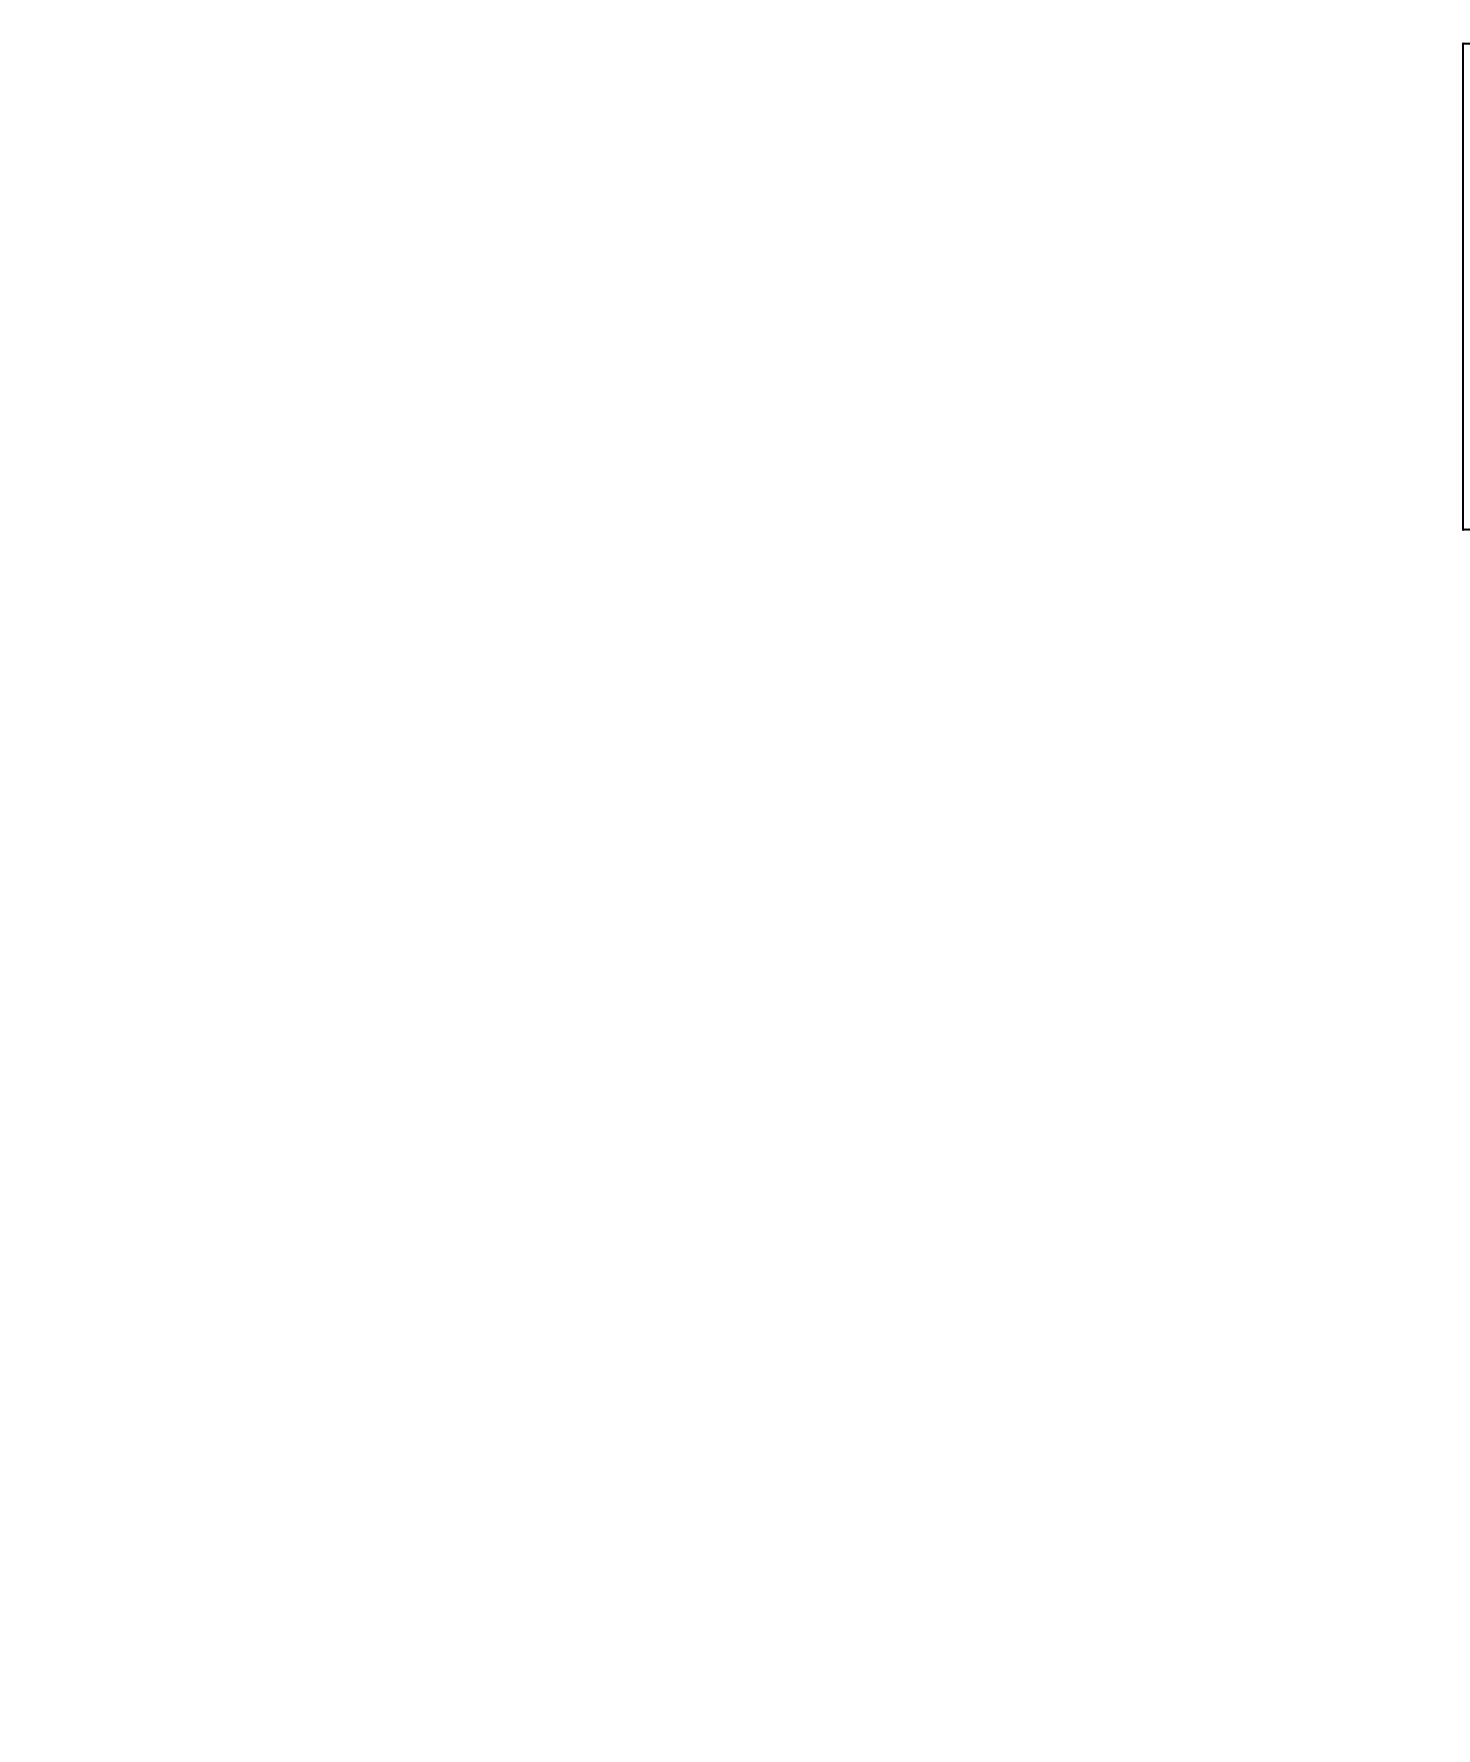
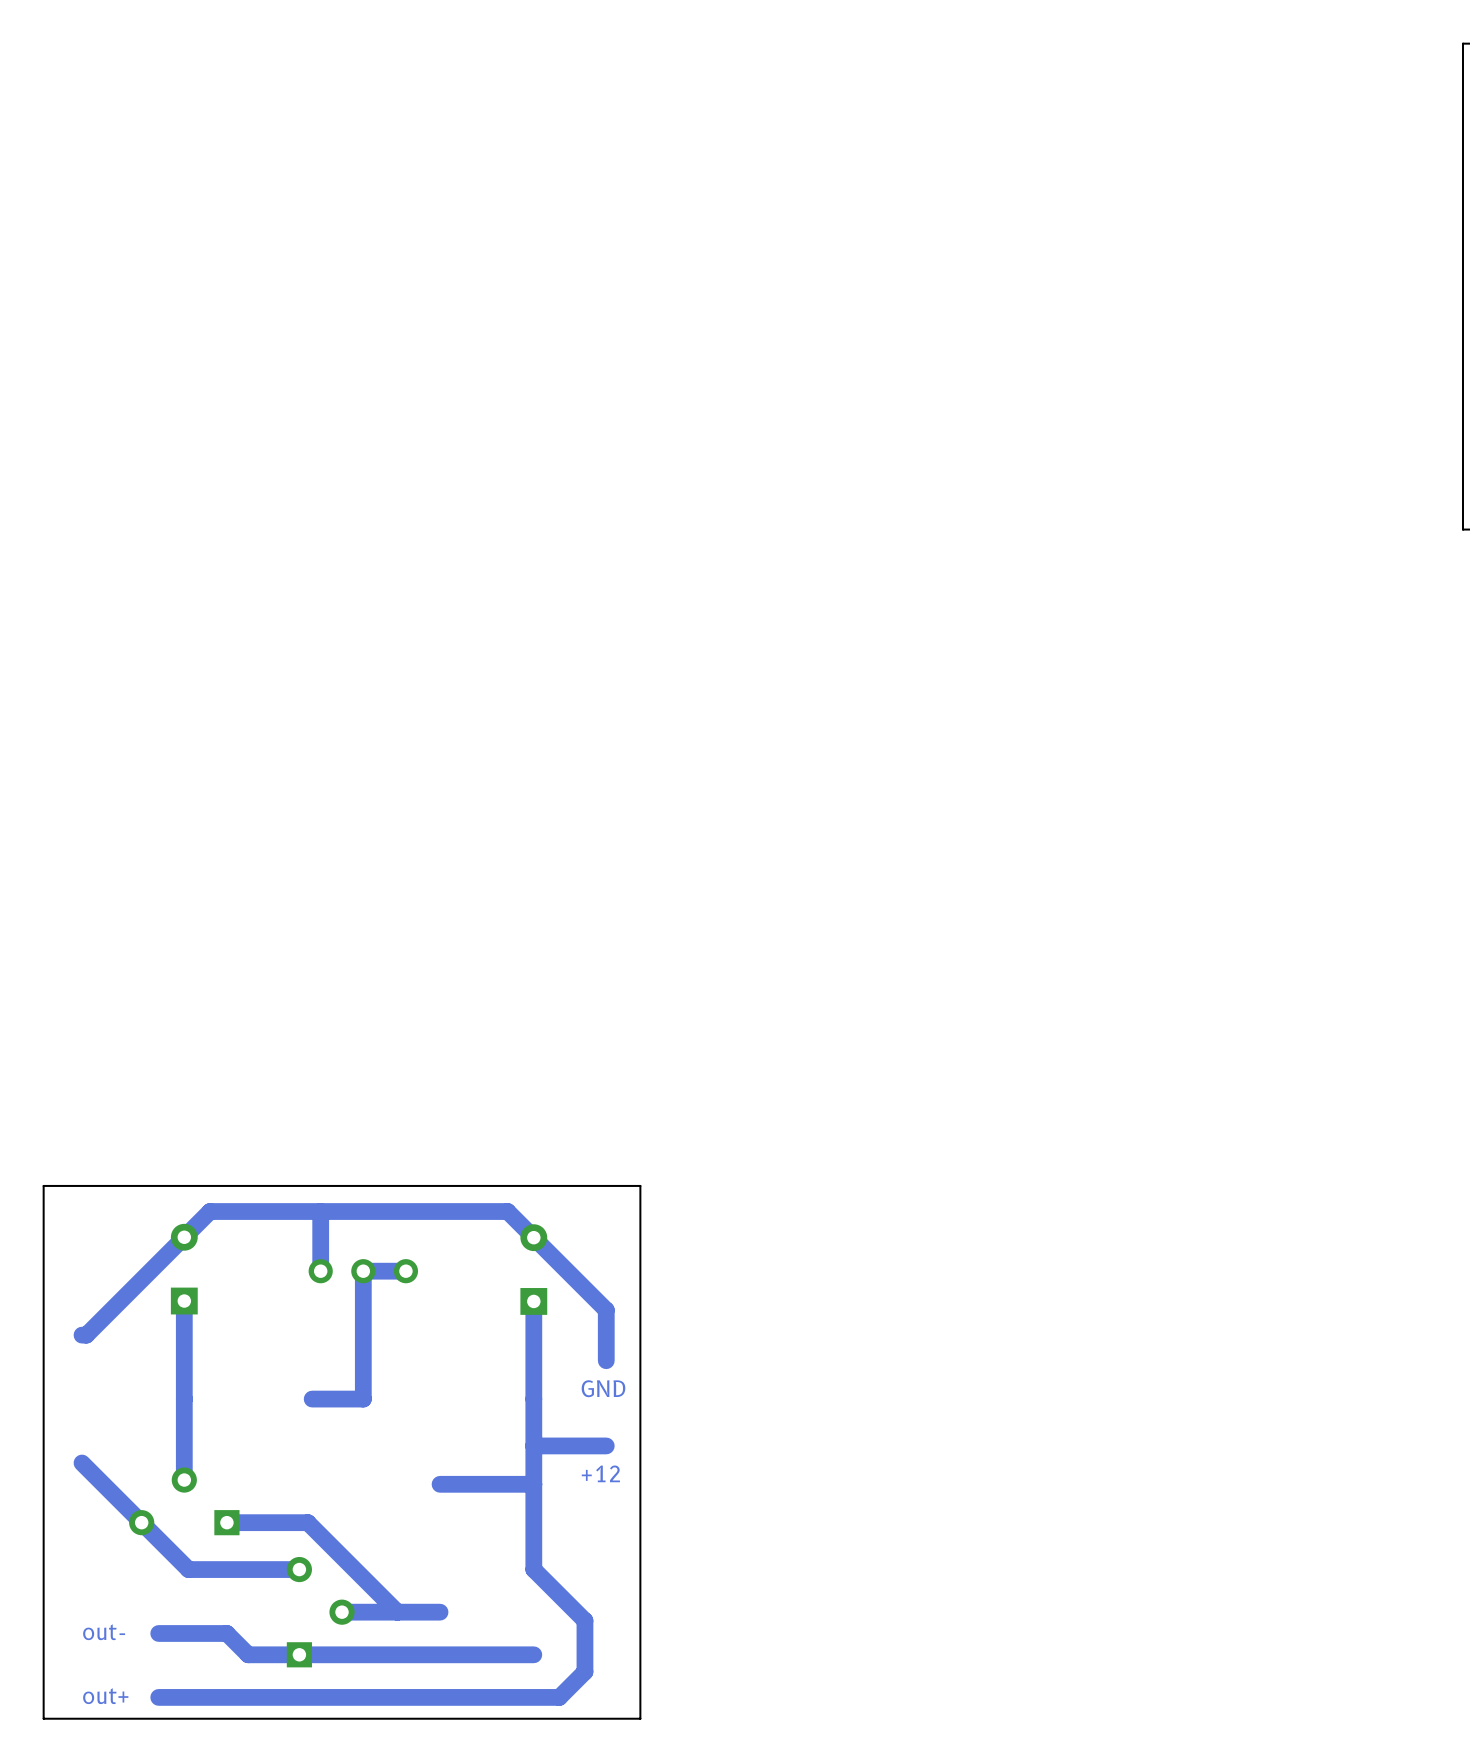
board edge: none -> (640, 1185) (43, 1185) (43, 1718) (640, 1718) (640, 1185)
bottom track: none -> (320, 1211) (320, 1271)
part: none -> (184, 1269)
part: none -> (533, 1269)
part: none -> (363, 1271)
bottom track: none -> (405, 1271) (363, 1271) (363, 1399) (312, 1399)
bottom track: none -> (184, 1301) (184, 1480)
bottom track: none -> (533, 1301) (533, 1569) (584, 1620) (584, 1671) (559, 1697) (158, 1697)
bottom track: none -> (82, 1335) (86, 1335) (210, 1211) (507, 1211) (606, 1310) (606, 1360)
text: none -> GND (603, 1388)
bottom track: none -> (606, 1445) (533, 1445)
bottom track: none -> (82, 1462) (188, 1569) (299, 1569)
text: none -> +12 (600, 1473)
bottom track: none -> (533, 1484) (440, 1484)
part: none -> (184, 1501)
bottom track: none -> (226, 1522) (307, 1522) (397, 1612)
part: none -> (320, 1612)
bottom track: none -> (440, 1612) (342, 1612)
text: none -> out- (104, 1632)
bottom track: none -> (158, 1633) (226, 1633) (248, 1654) (533, 1654)
text: none -> out+ (105, 1696)

